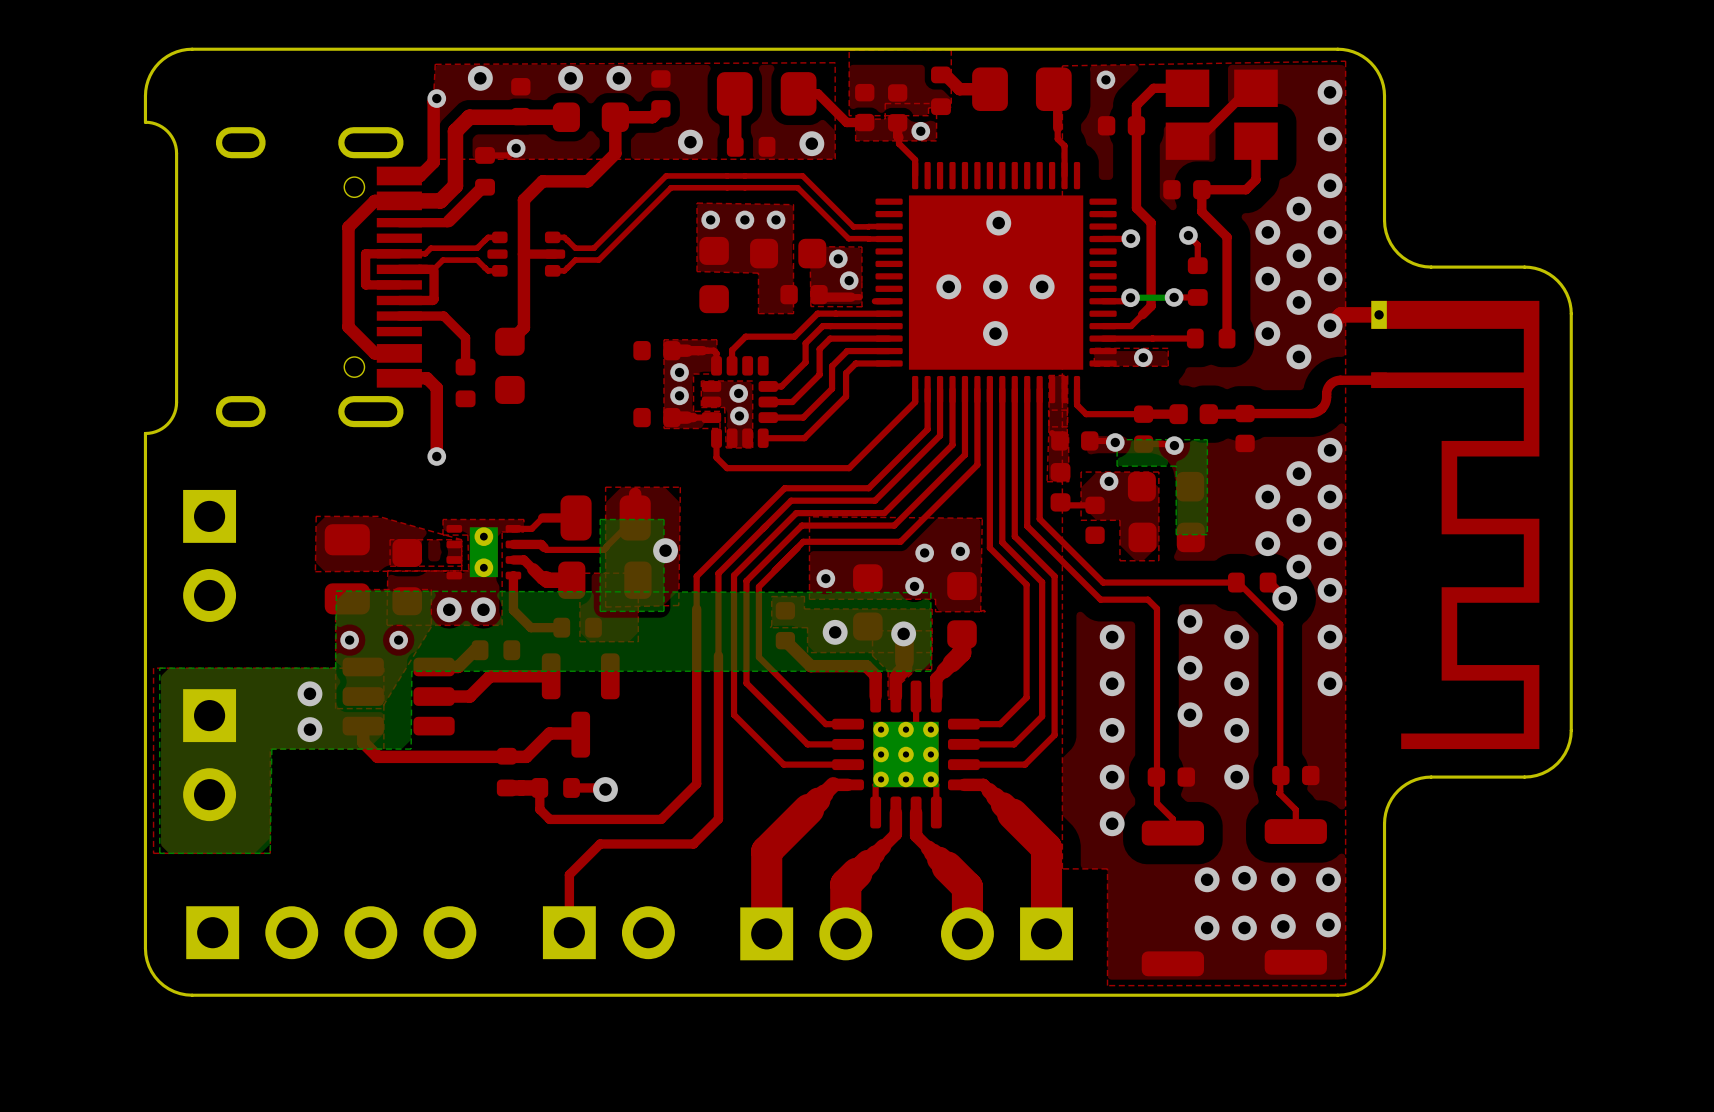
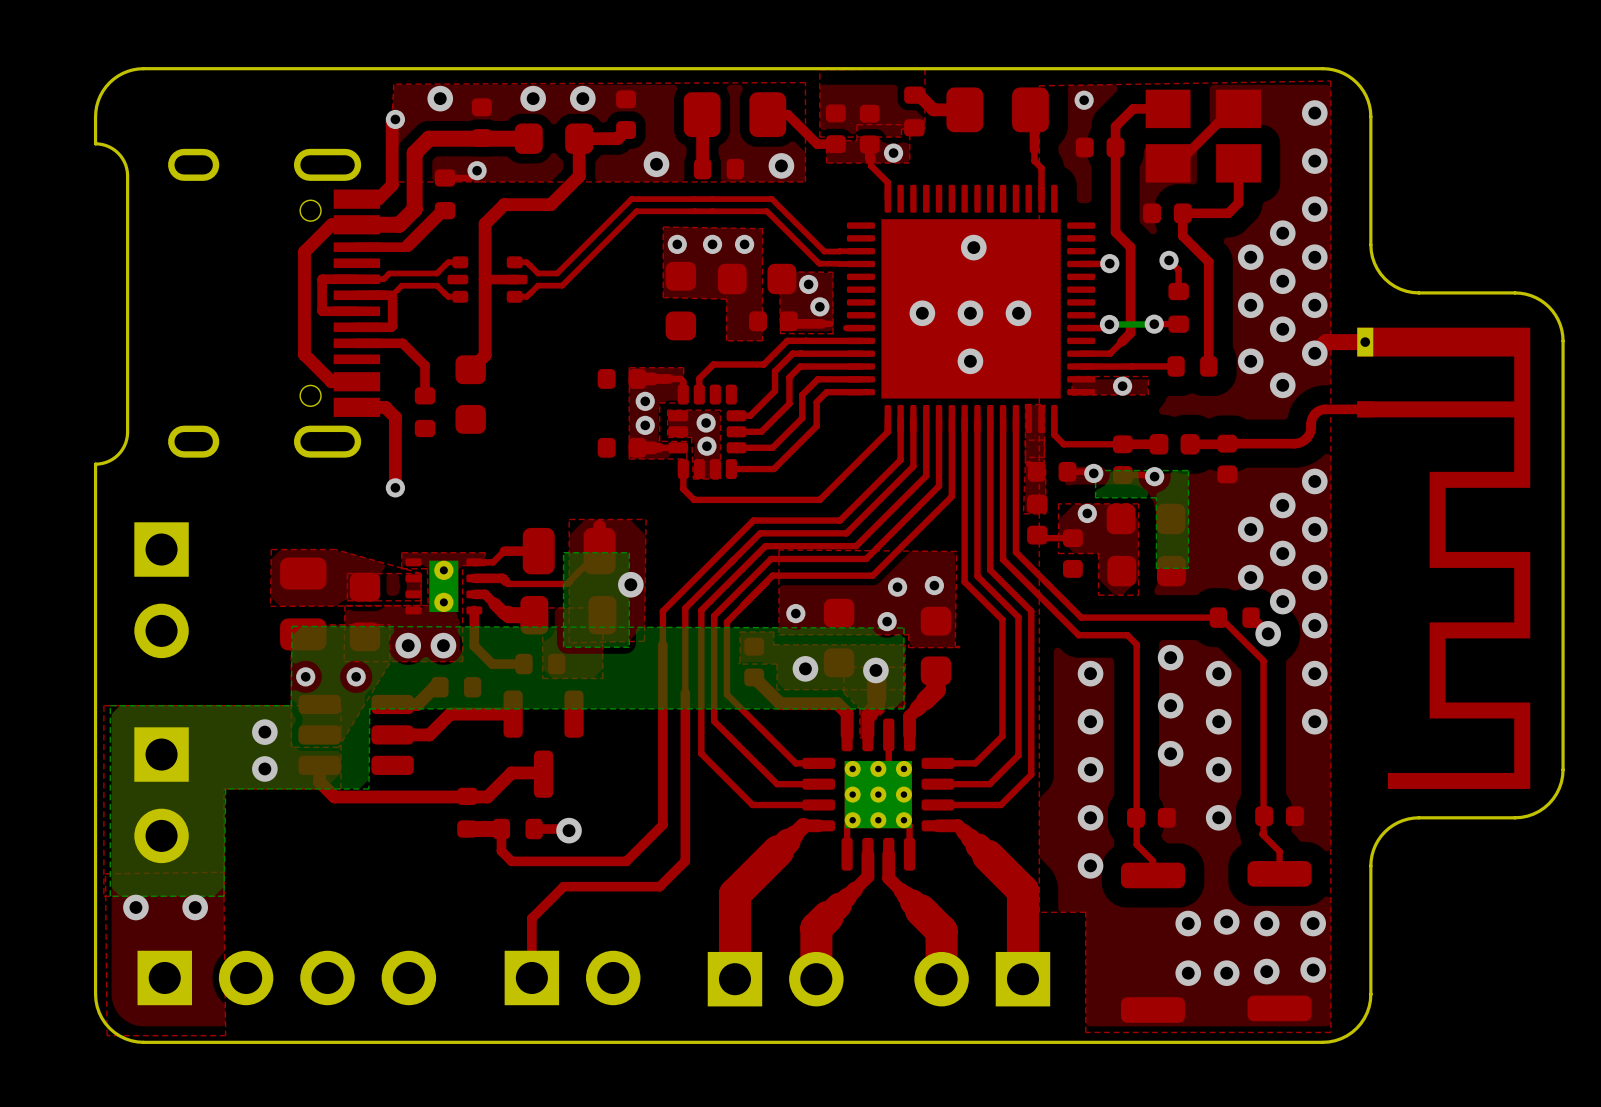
top zone outline: none -> (224, 872) (105, 873) (107, 1035) (225, 1035) (224, 896)
via: none -> (135, 907)
via: none -> (195, 907)

